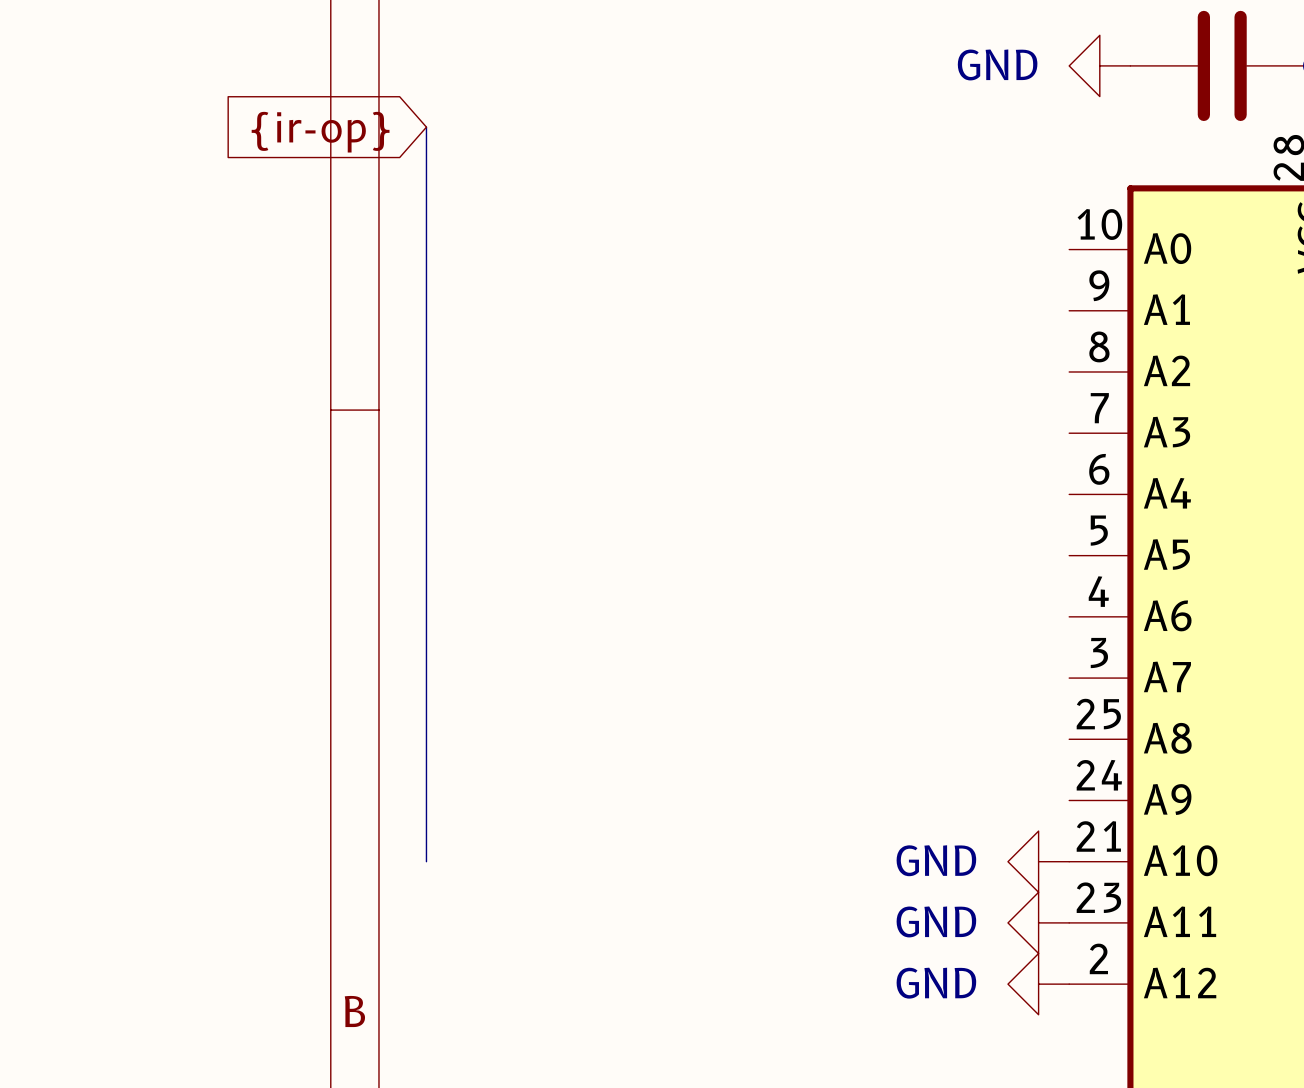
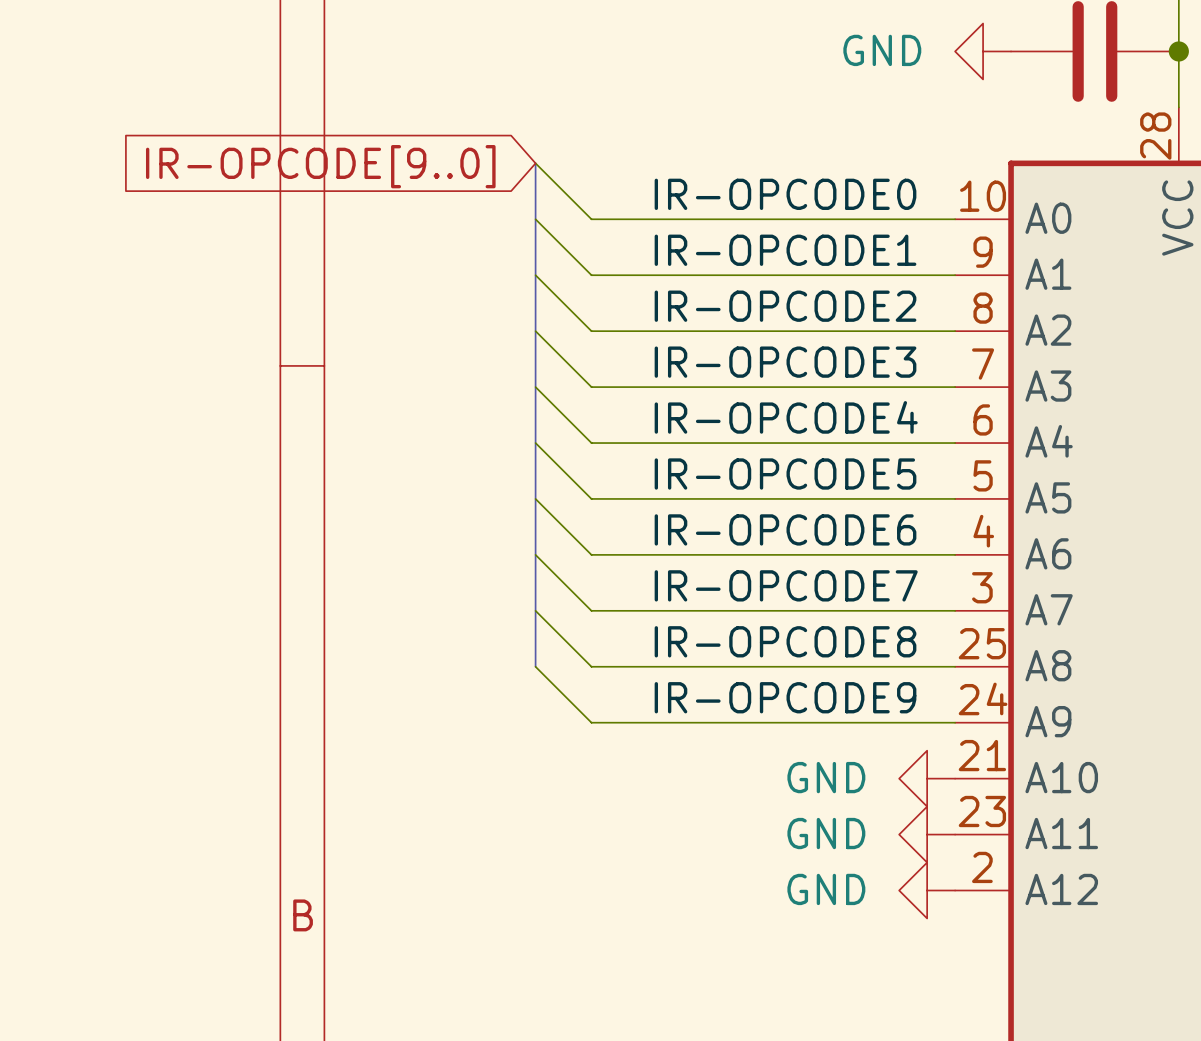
bus: (426, 127) (426, 861) -> none
global label: {ir-op} (320, 132) -> none
wire: none -> (535, 163) (591, 219) (955, 219)
bus: none -> (535, 163) (535, 666)
global label: none -> IR-OPCODE[9..0] (320, 166)
label: none -> IR-OPCODE0 (785, 194)
wire: none -> (535, 219) (591, 275) (955, 275)
label: none -> IR-OPCODE1 (785, 250)
wire: none -> (535, 275) (591, 331) (955, 331)
label: none -> IR-OPCODE2 (785, 306)
wire: none -> (535, 331) (591, 387) (955, 387)
label: none -> IR-OPCODE3 (785, 362)
wire: none -> (535, 387) (591, 443) (955, 443)
label: none -> IR-OPCODE4 (786, 417)
wire: none -> (535, 443) (591, 498) (955, 498)
label: none -> IR-OPCODE5 (785, 474)
wire: none -> (535, 498) (591, 554) (955, 554)
label: none -> IR-OPCODE6 (785, 529)
wire: none -> (535, 554) (591, 610) (955, 610)
label: none -> IR-OPCODE7 (786, 585)
wire: none -> (535, 610) (591, 666) (955, 666)
label: none -> IR-OPCODE8 (785, 641)
wire: none -> (535, 666) (591, 722) (955, 722)
label: none -> IR-OPCODE9 (785, 697)

